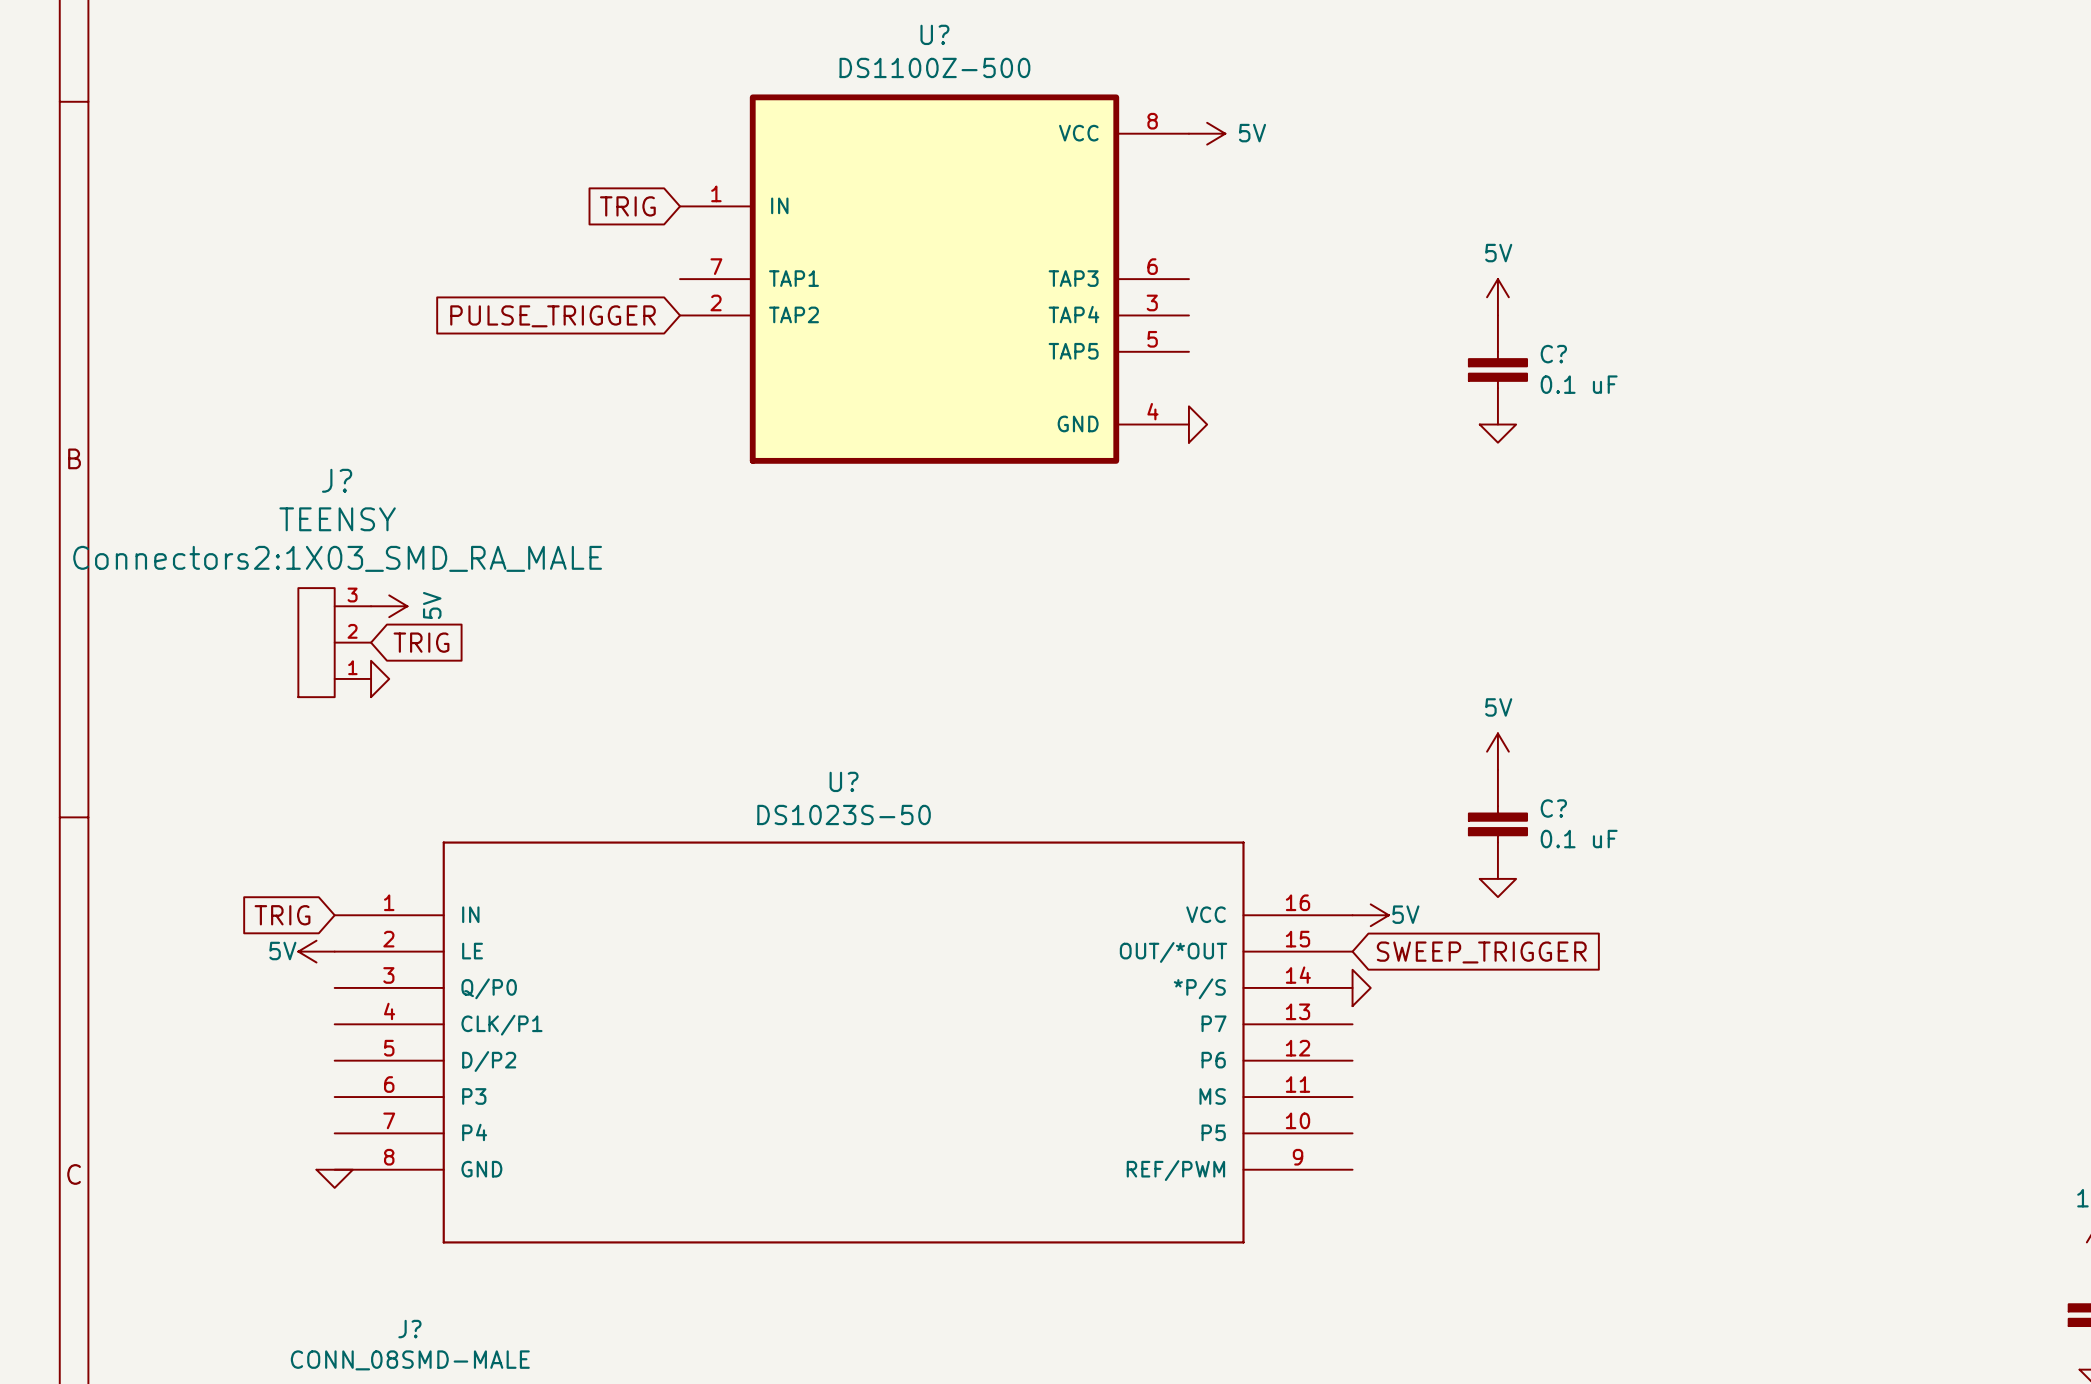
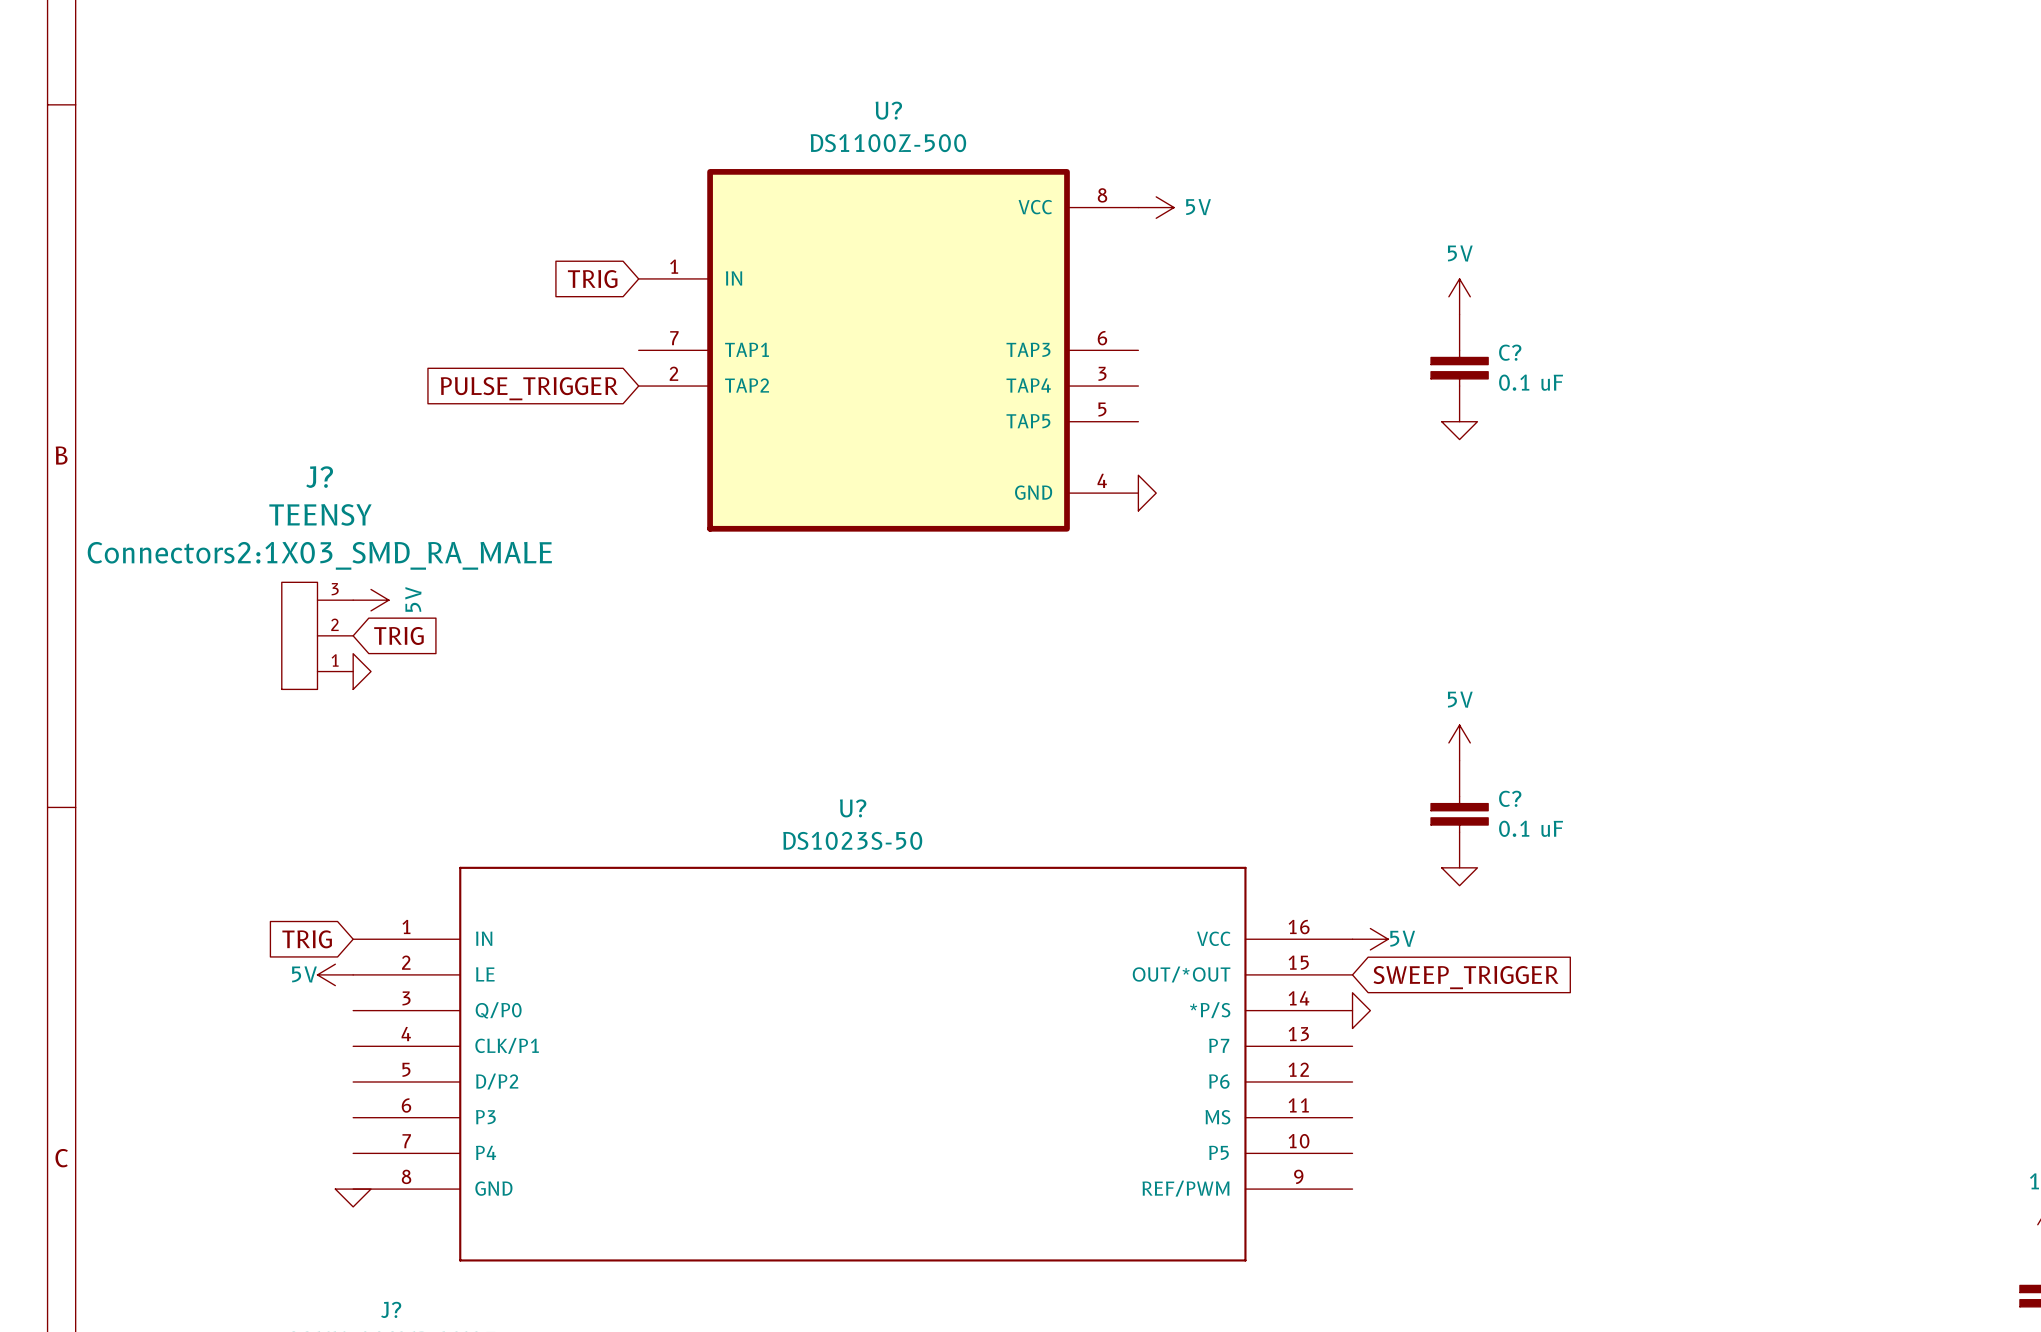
power symbol position: 5V (1207, 133) -> 5V (1156, 207)
global label position: TRIG (627, 206) -> TRIG (592, 279)
U? position: (934, 279) -> (888, 350)
global label position: PULSE_TRIGGER (553, 316) -> PULSE_TRIGGER (529, 388)
power symbol position: (1198, 424) -> (1147, 493)
global label position: TRIG (282, 915) -> TRIG (307, 939)
power symbol position: 5V (1370, 915) -> 5V (1370, 939)
power symbol position: 5V (316, 951) -> 5V (335, 974)
global label position: SWEEP_TRIGGER (1481, 952) -> SWEEP_TRIGGER (1466, 977)
power symbol position: (1361, 987) -> (1361, 1010)
U? position: (843, 1042) -> (852, 1064)
power symbol position: (334, 1178) -> (353, 1197)

